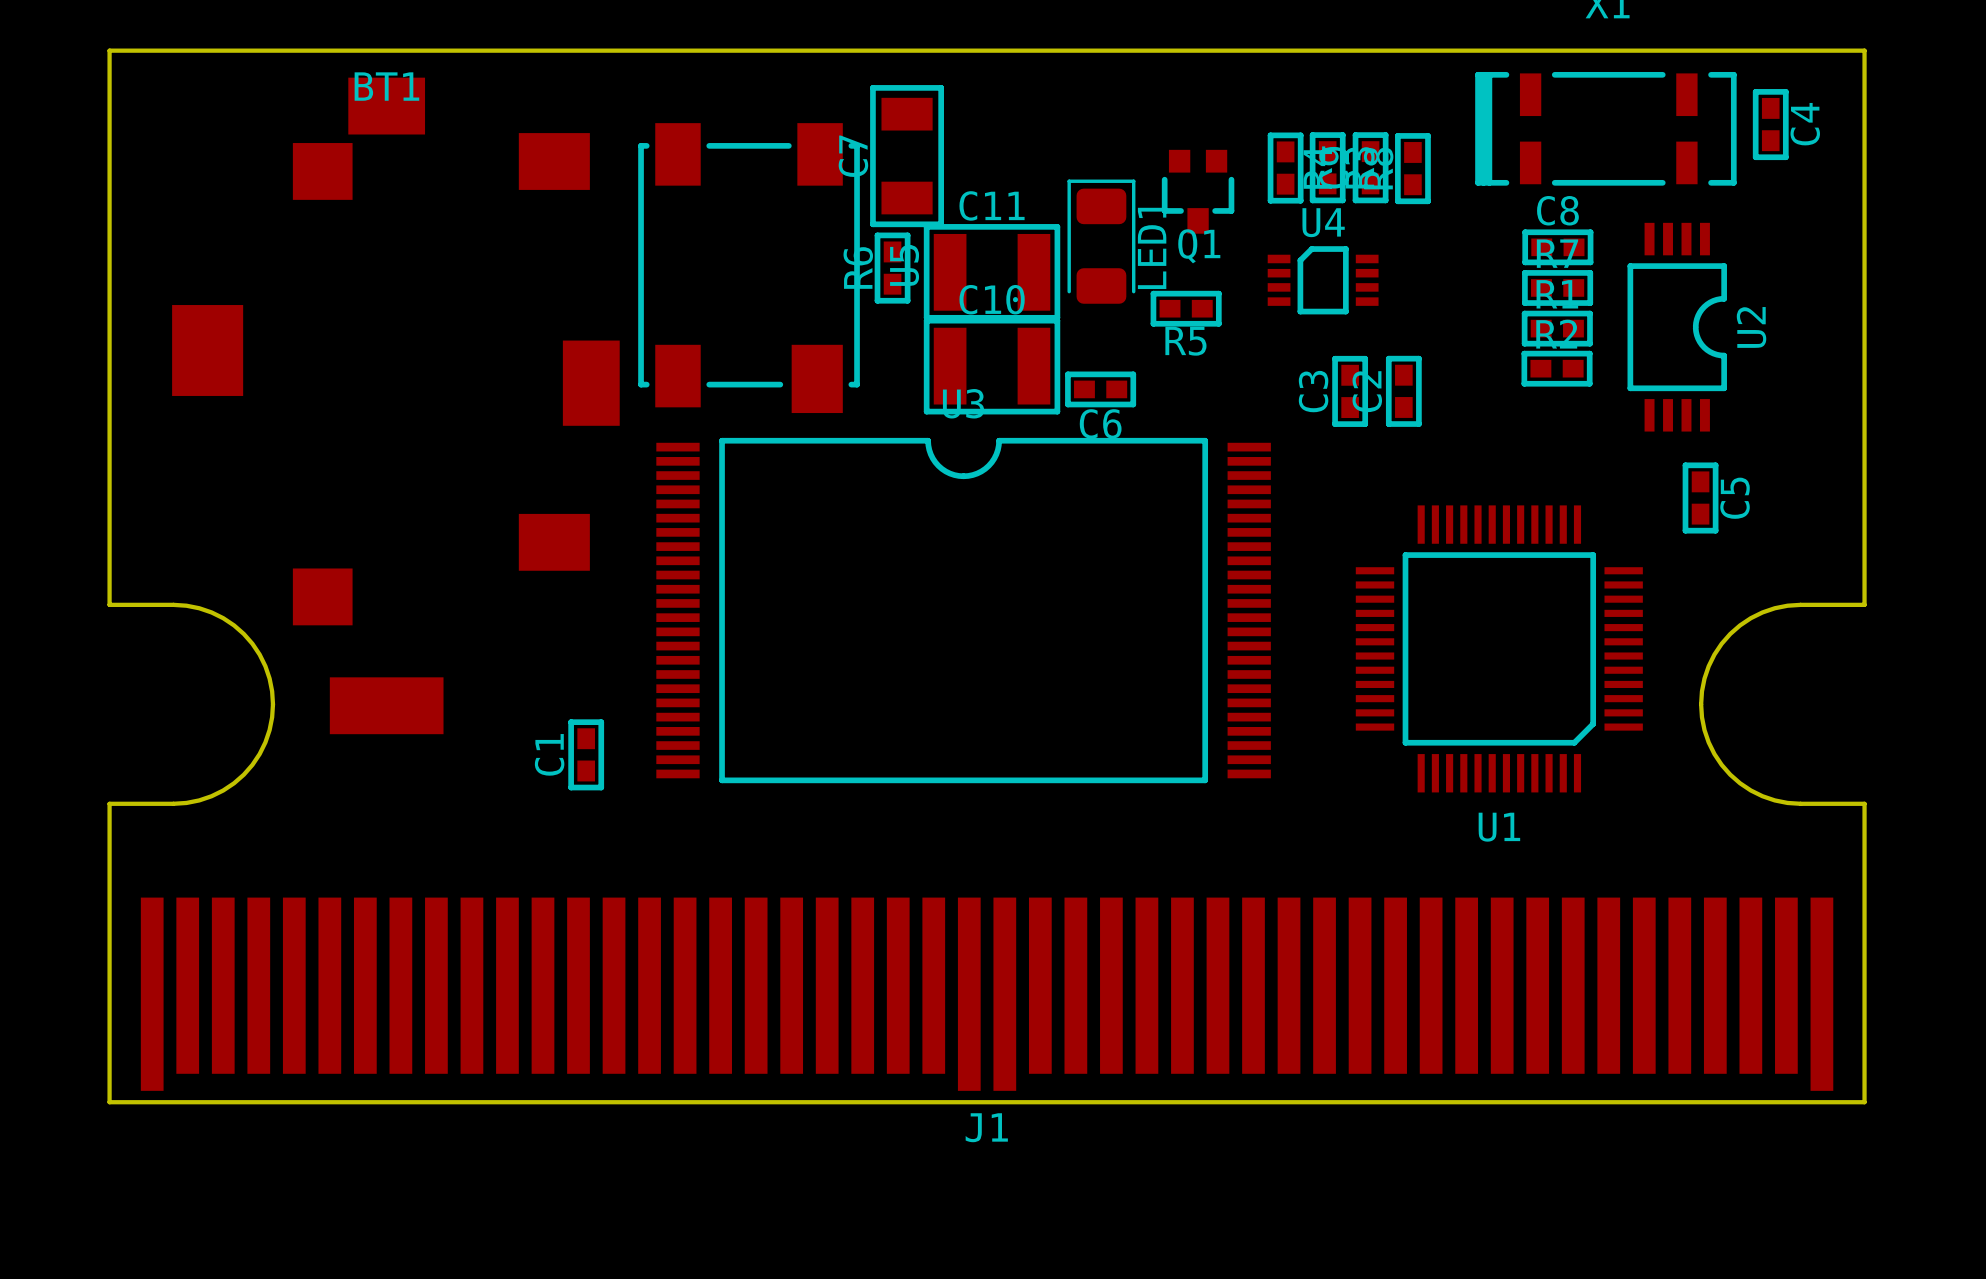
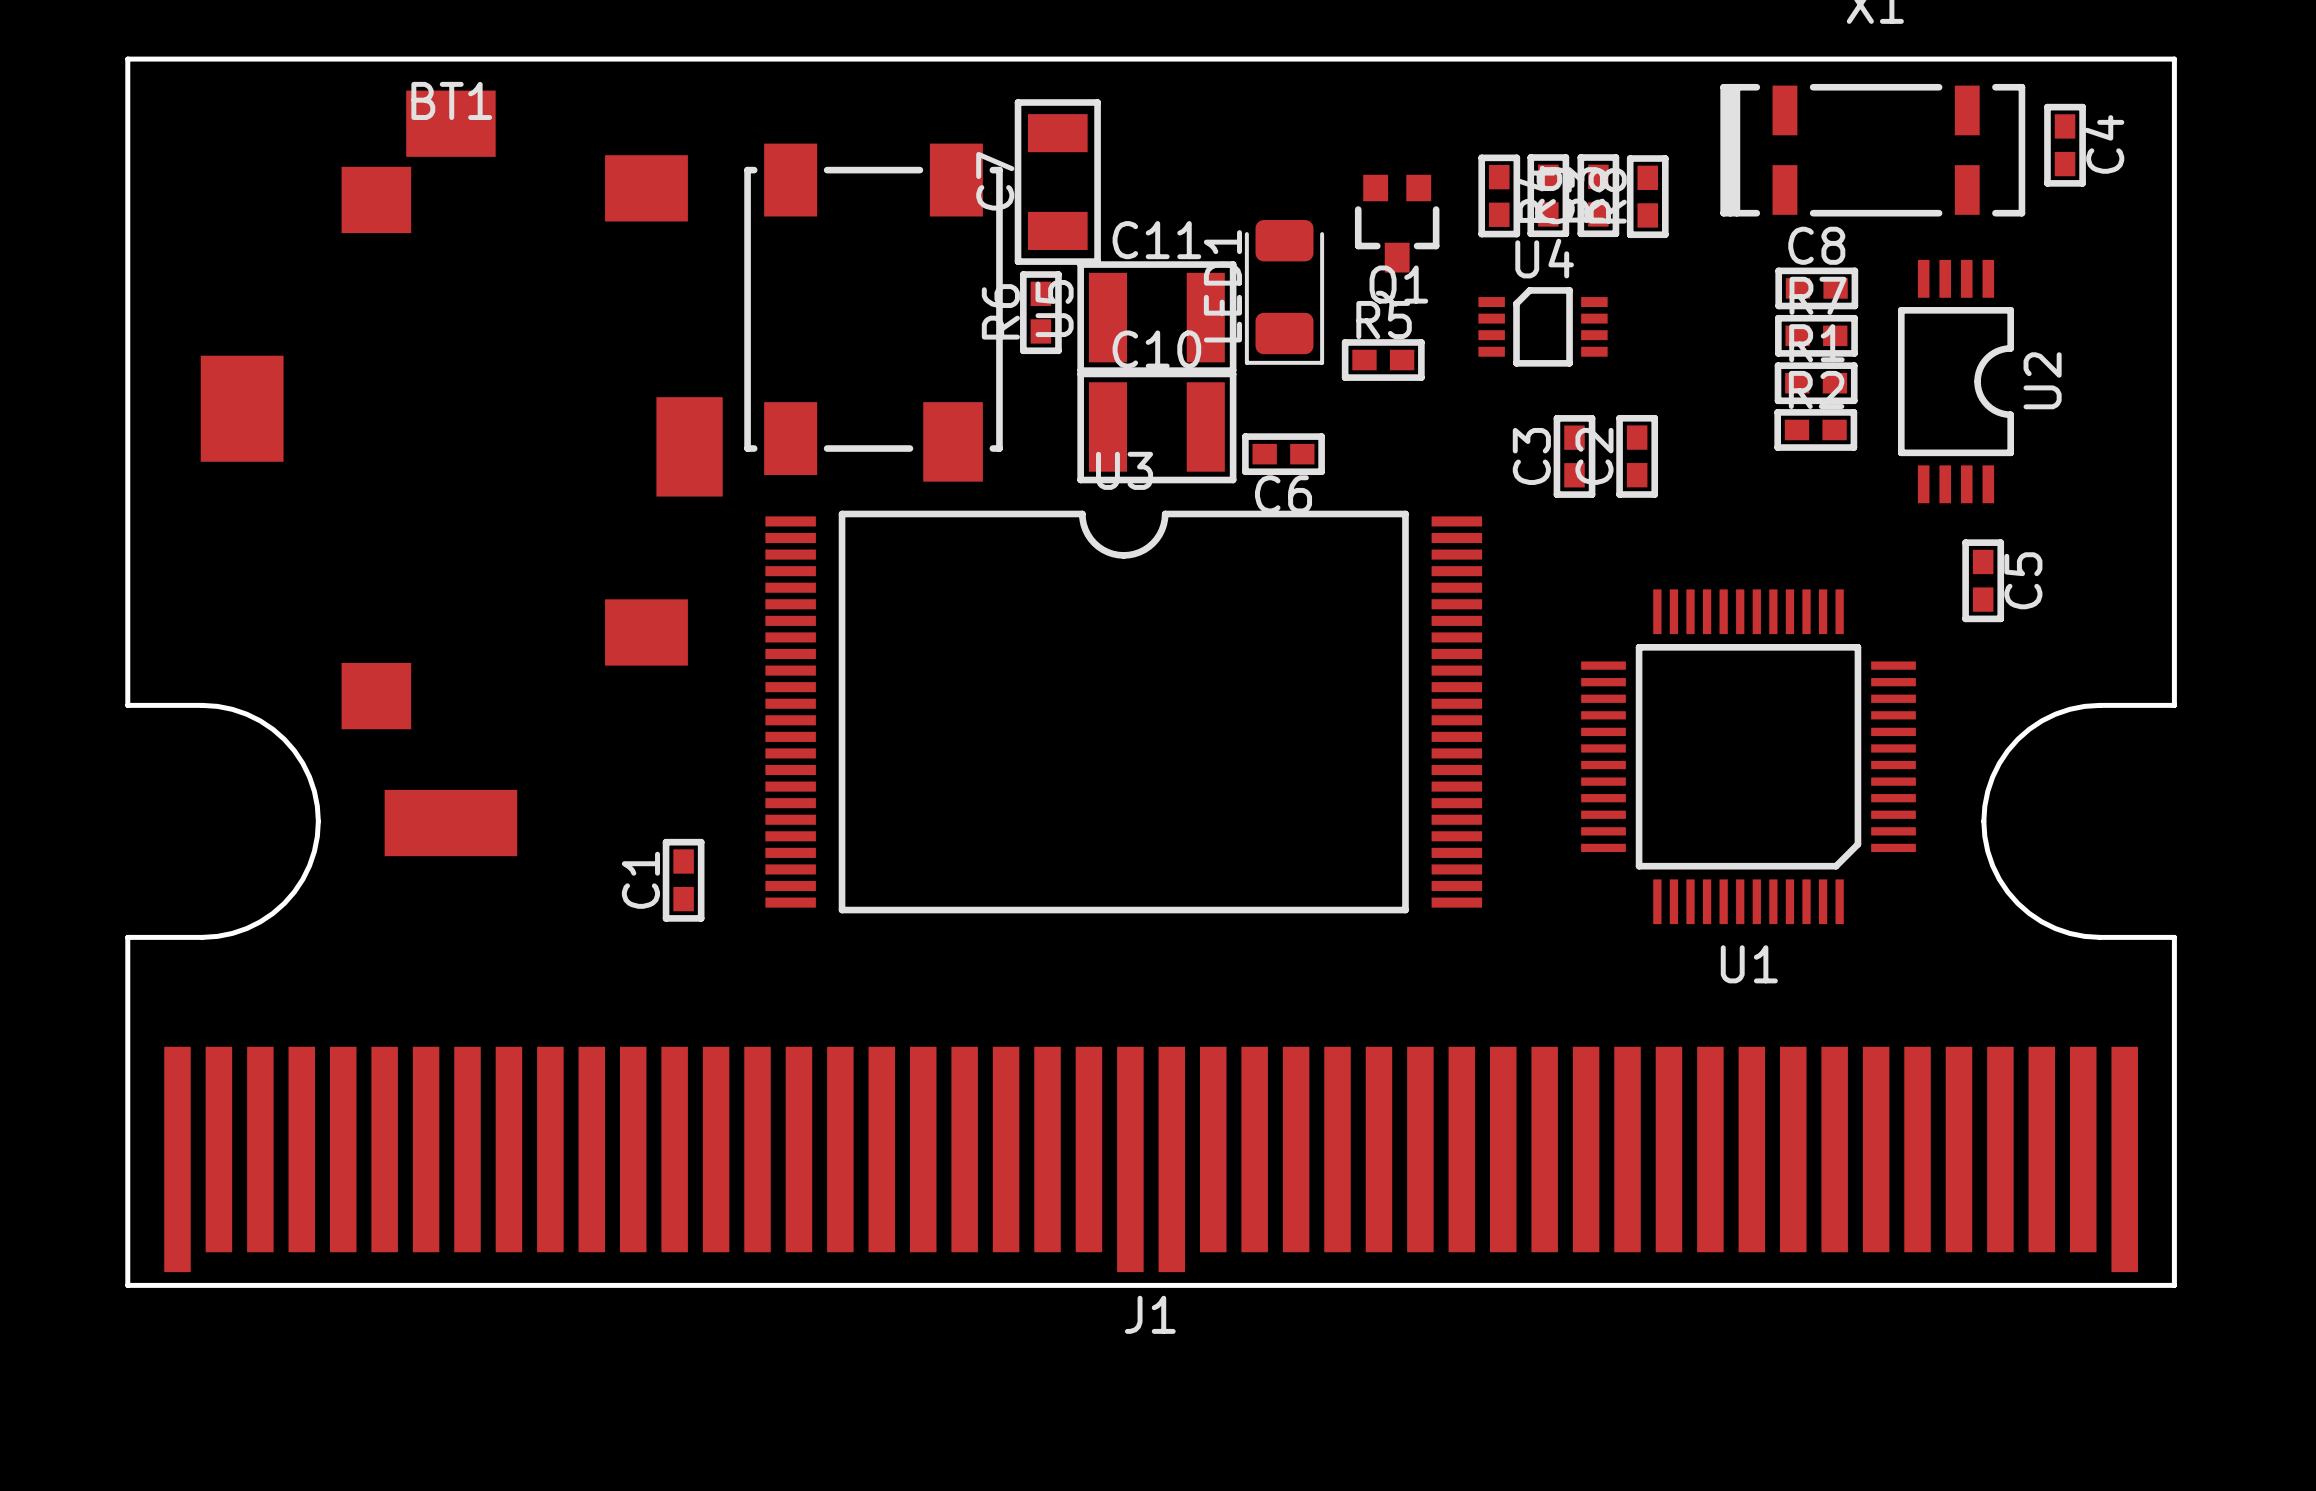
LED1 rotation: 0° (1101, 241) -> 180° (1284, 292)
R5 name position: R5 (1185, 341) -> R5 (1384, 320)

